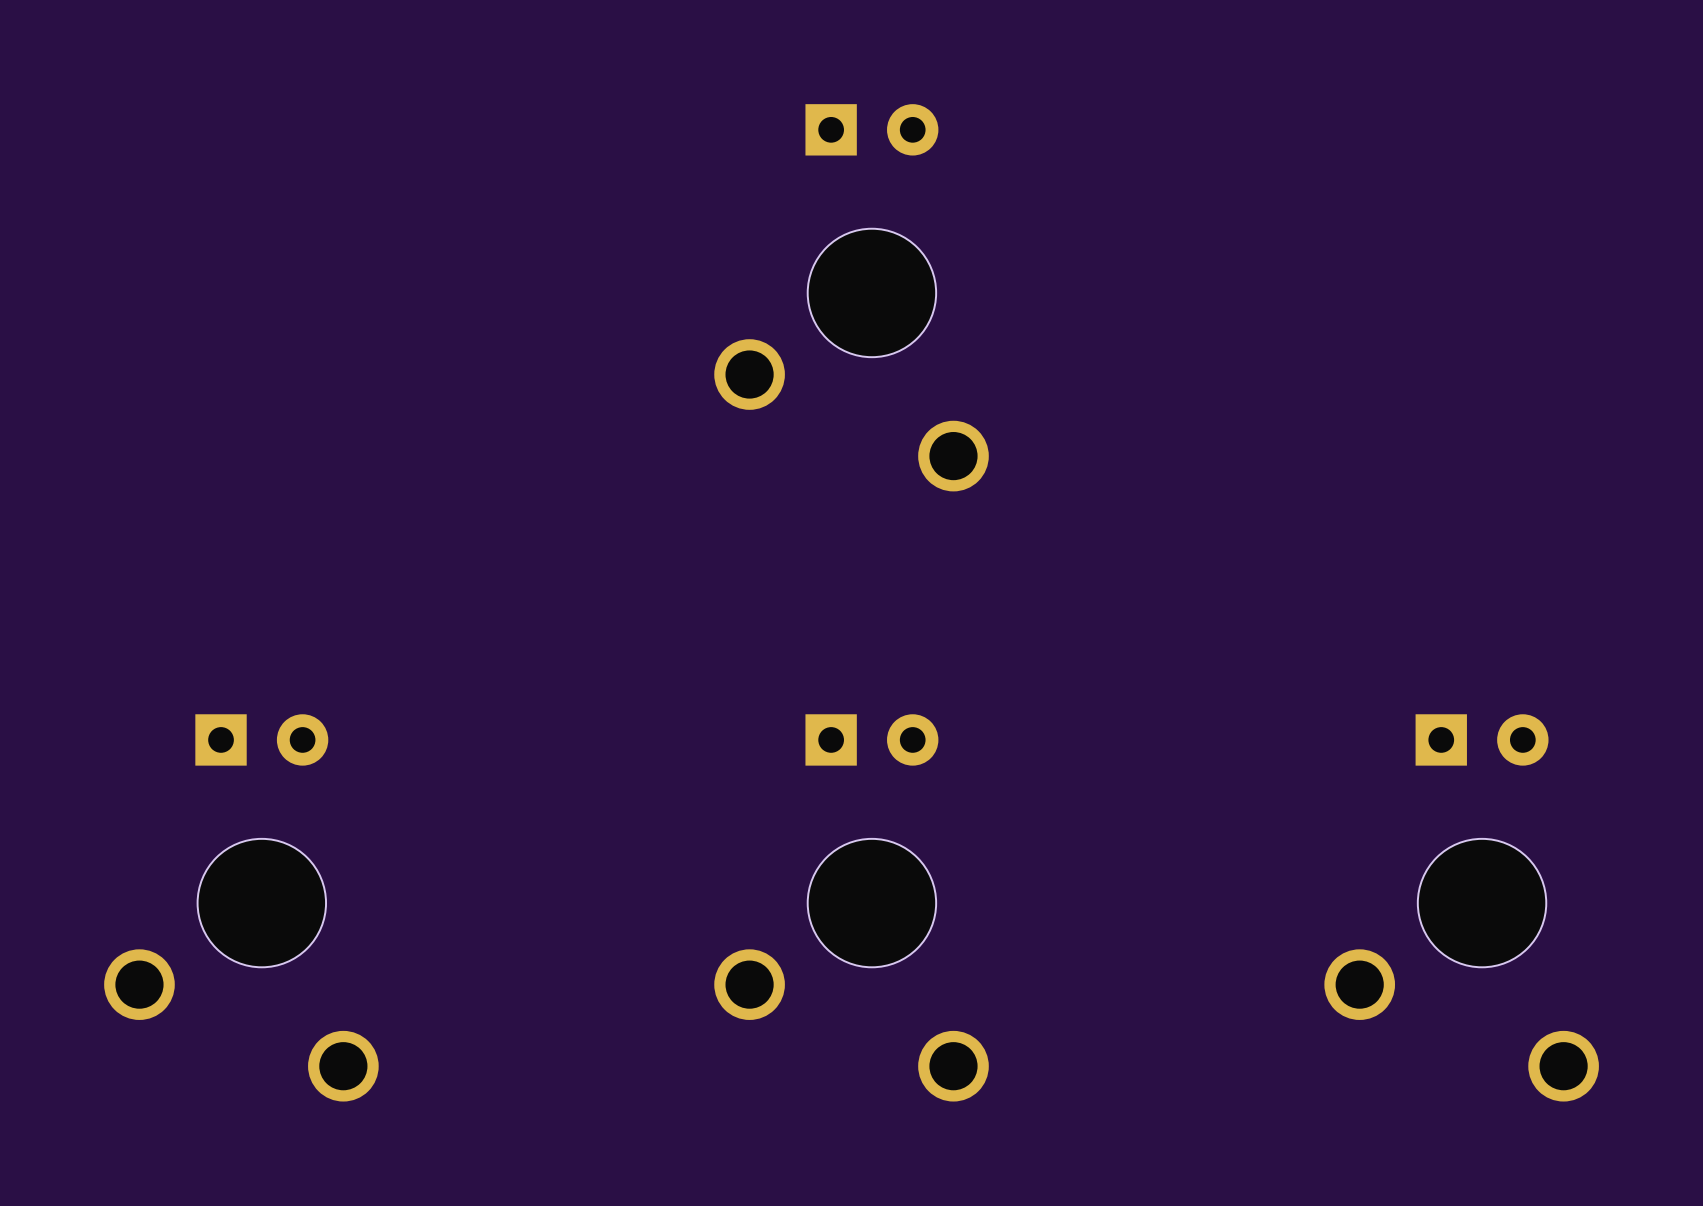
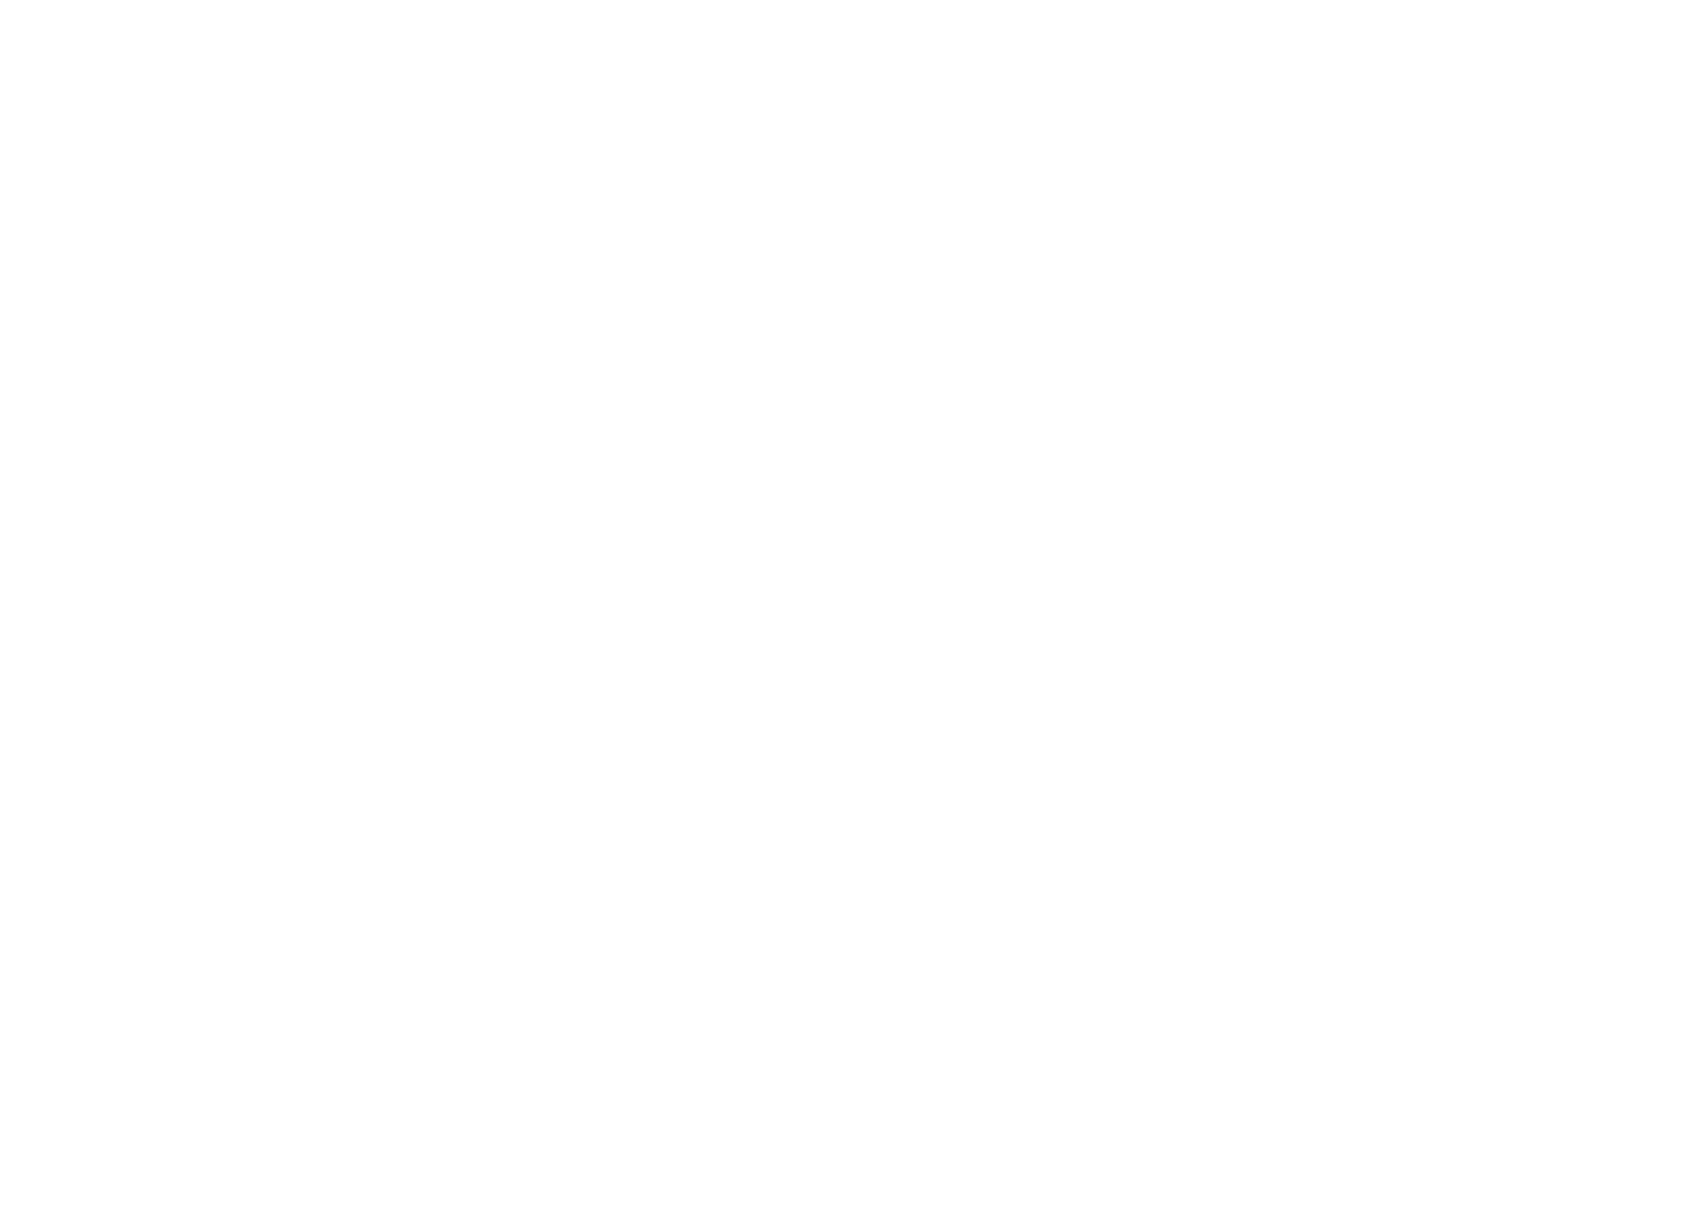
part: (851, 297) -> none
part: (241, 907) -> none
part: (851, 907) -> none
part: (1461, 907) -> none

